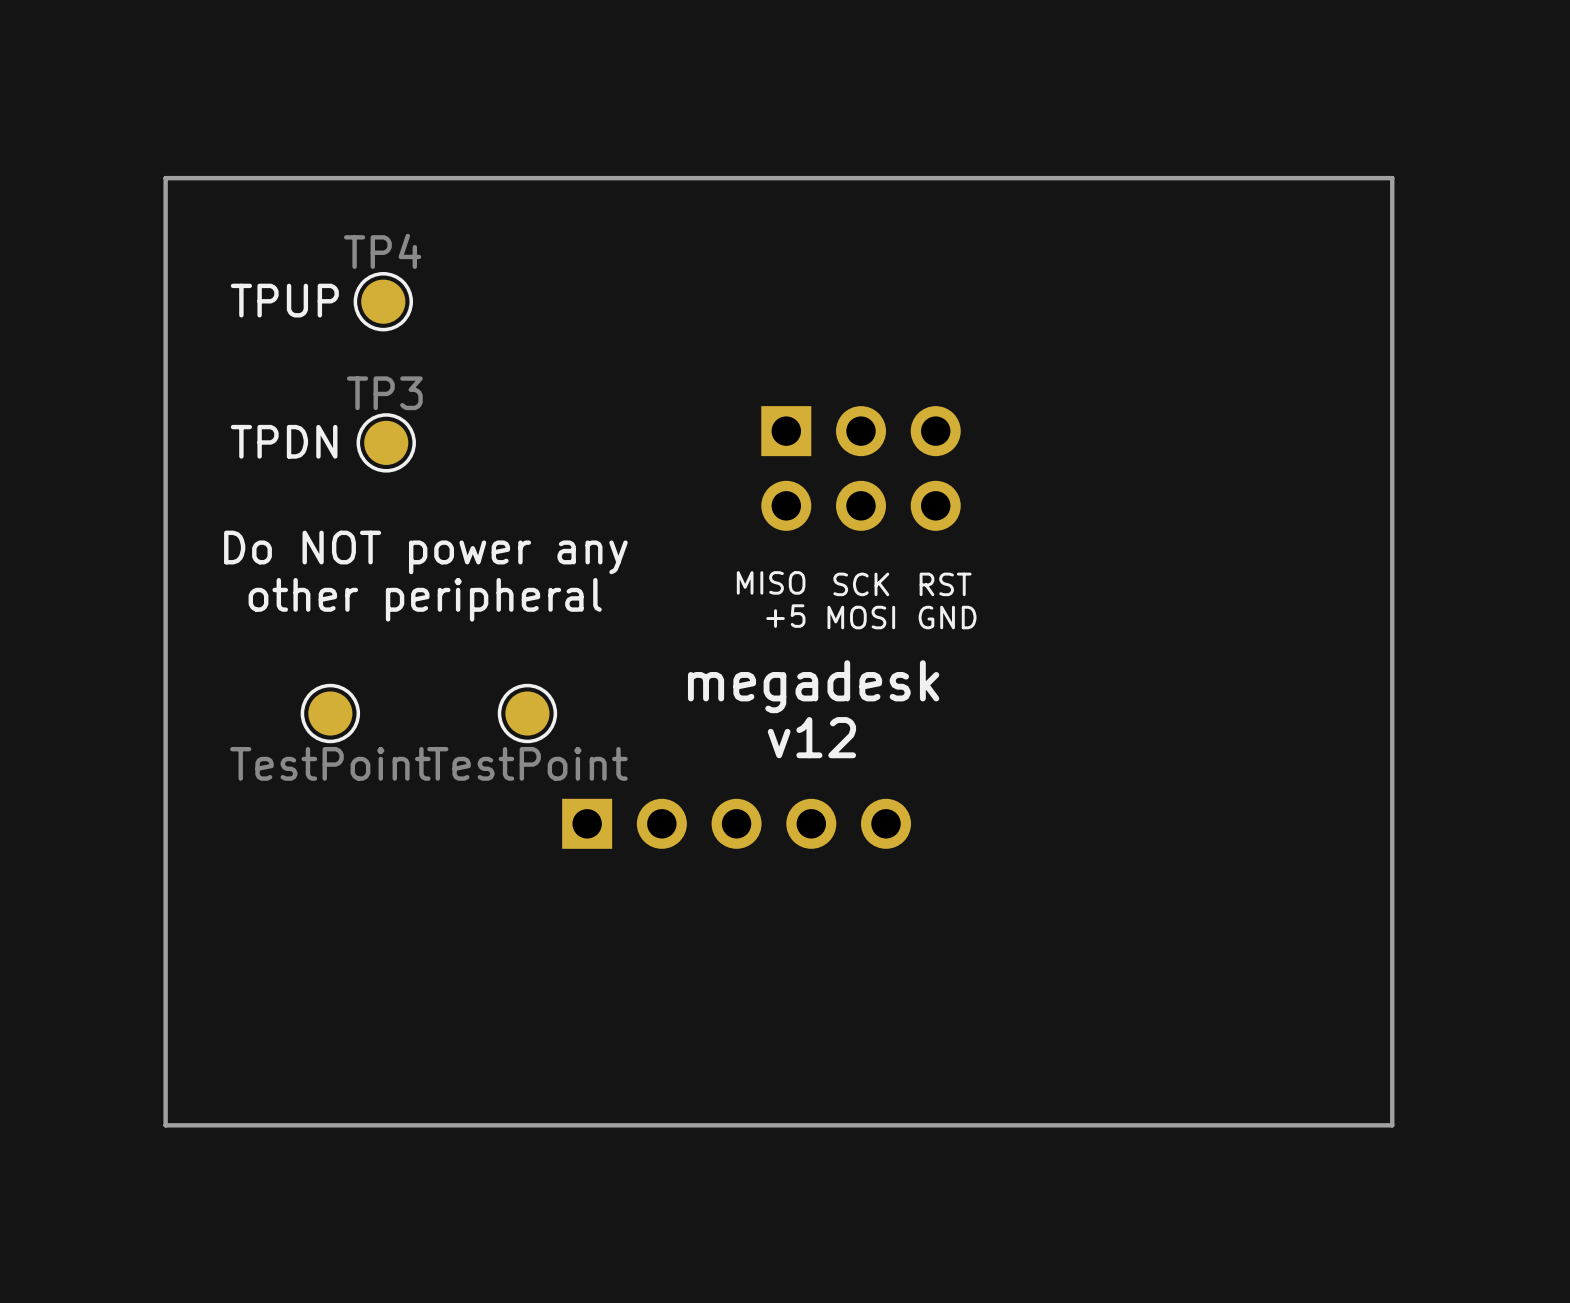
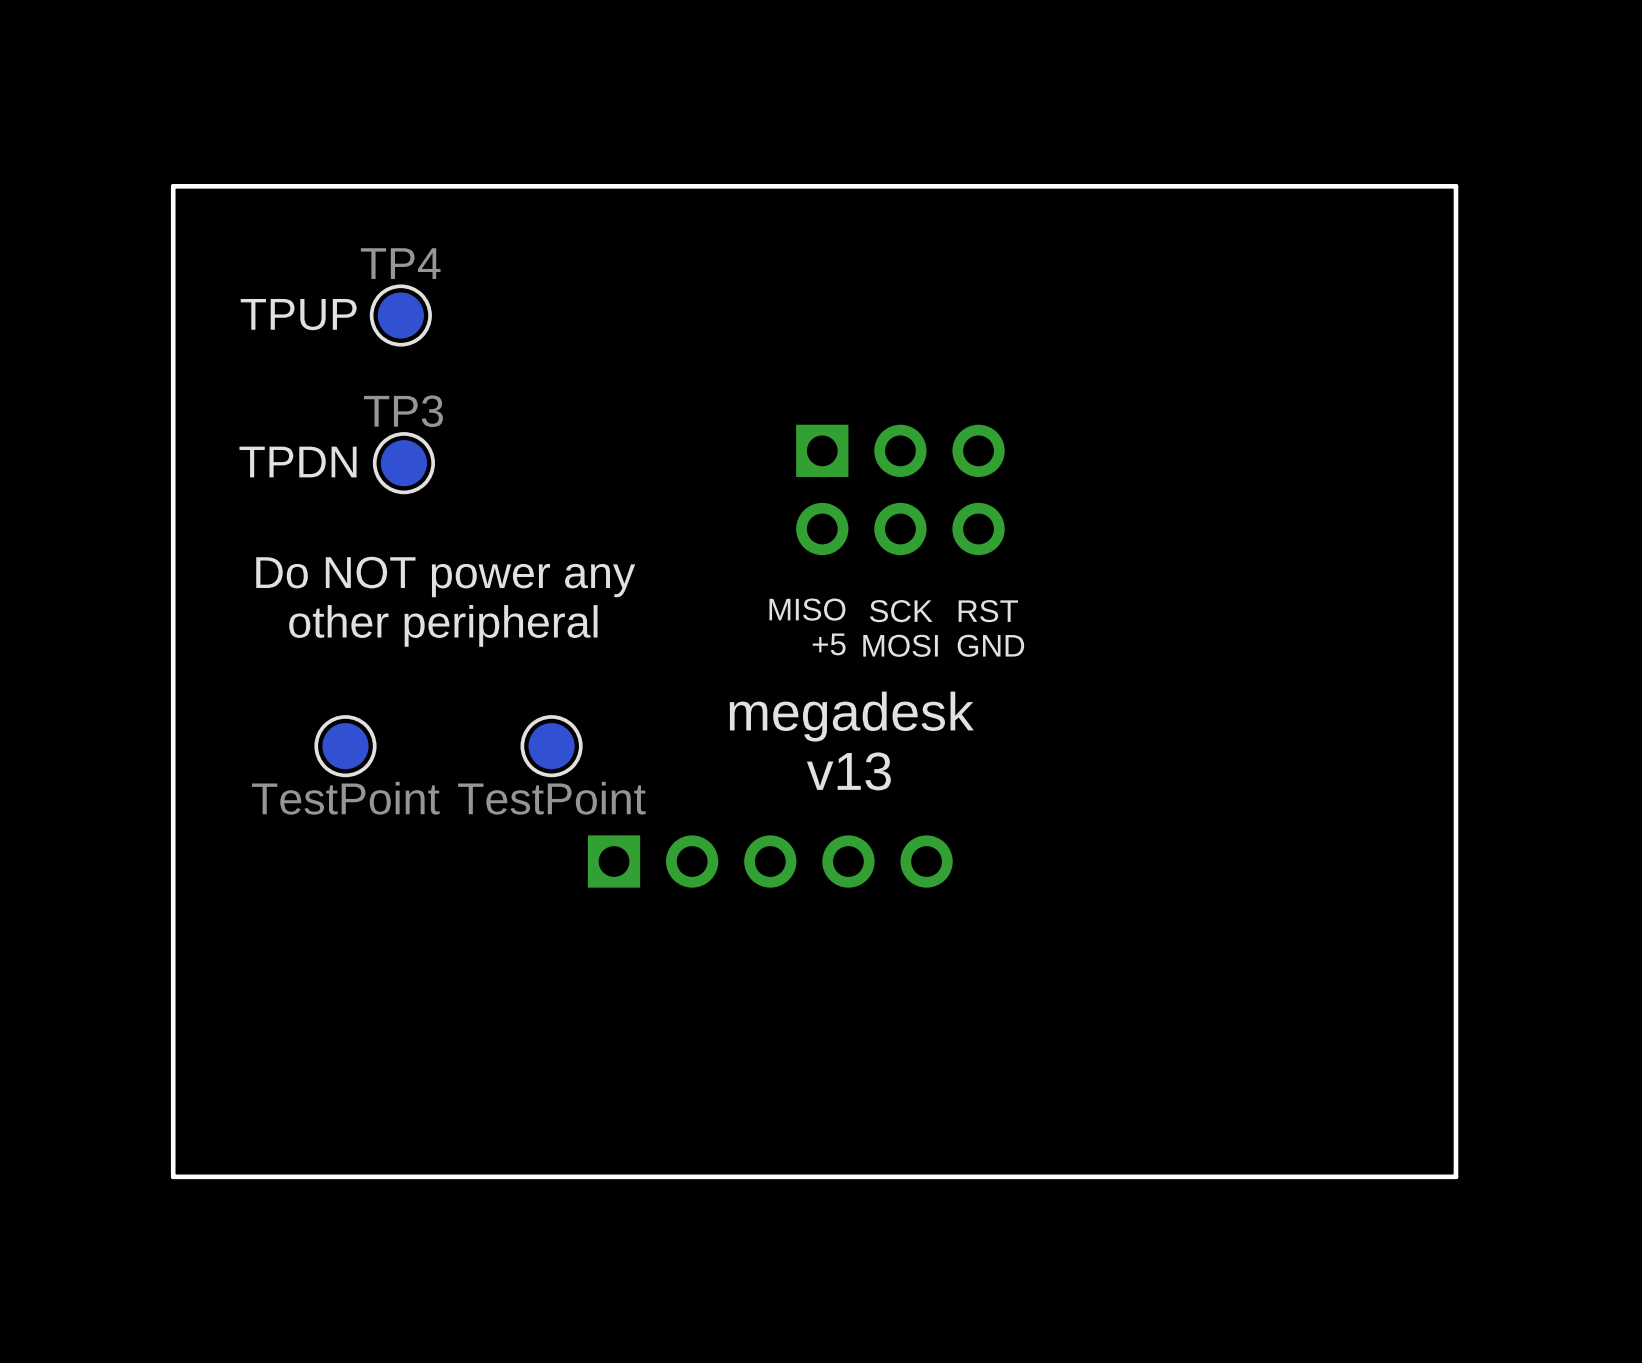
text: v12 (811, 737) -> v13 (848, 771)

